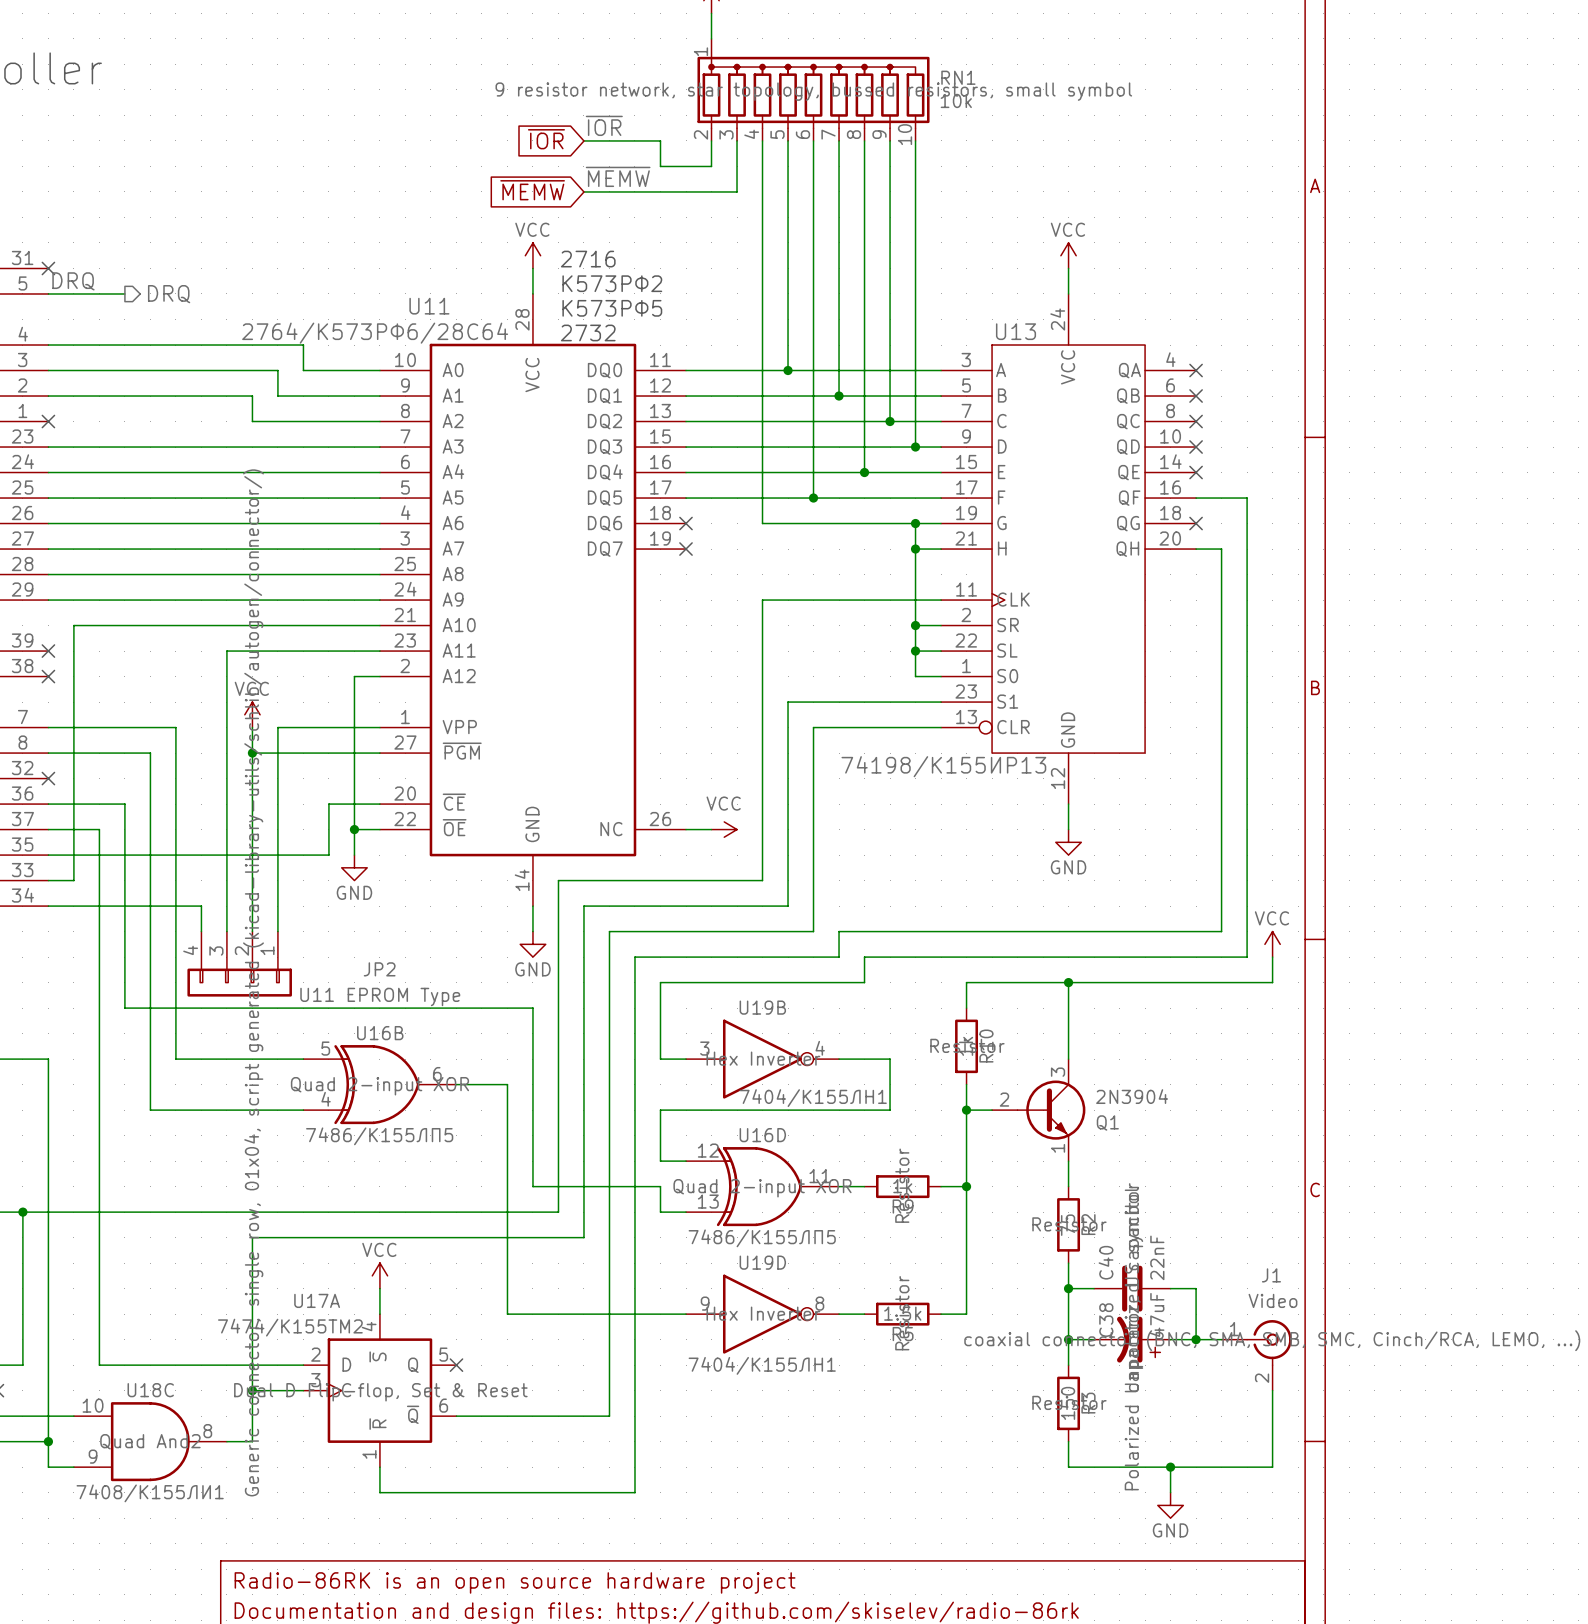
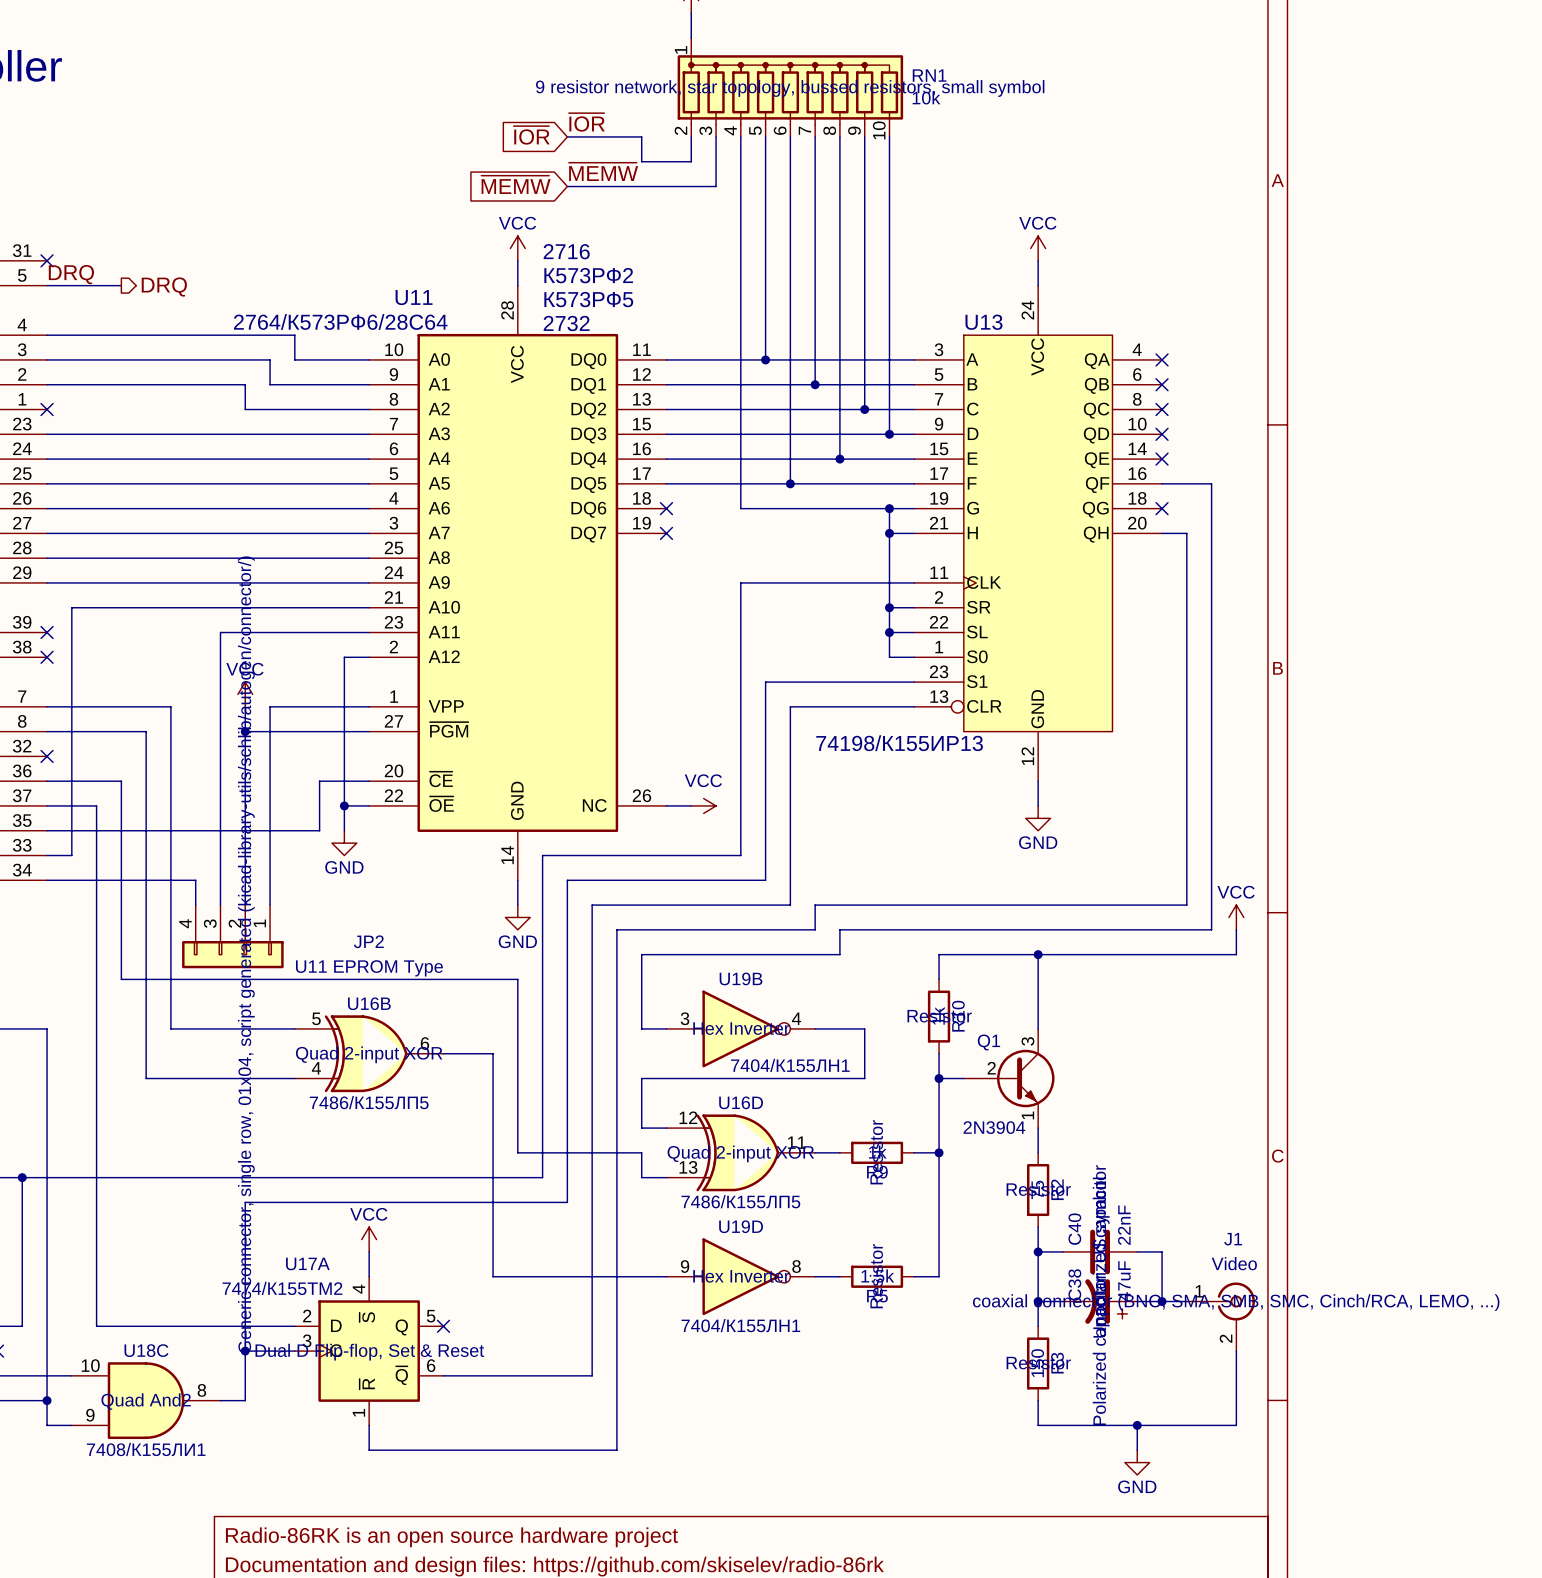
Q1 symbol: [992, 1059, 1086, 1162] -> [963, 1028, 1055, 1129]
Q1 value position: 2N3904 (1132, 1096) -> 2N3904 (994, 1127)
Q1 name position: Q1 (1107, 1122) -> Q1 (988, 1042)

